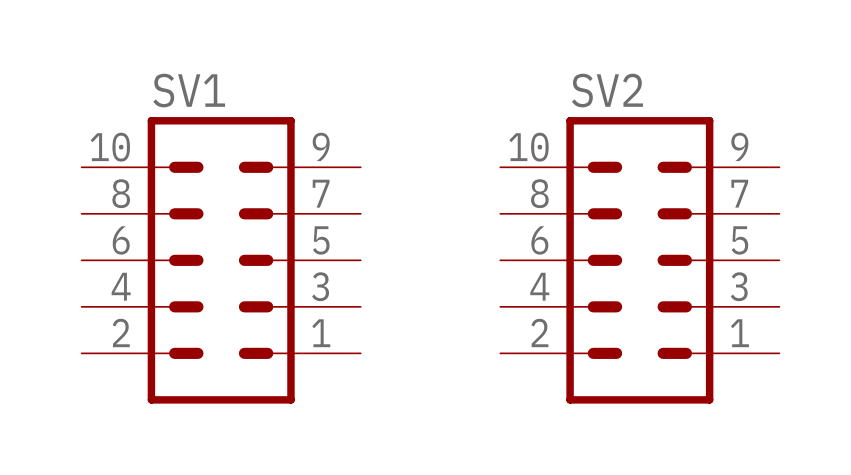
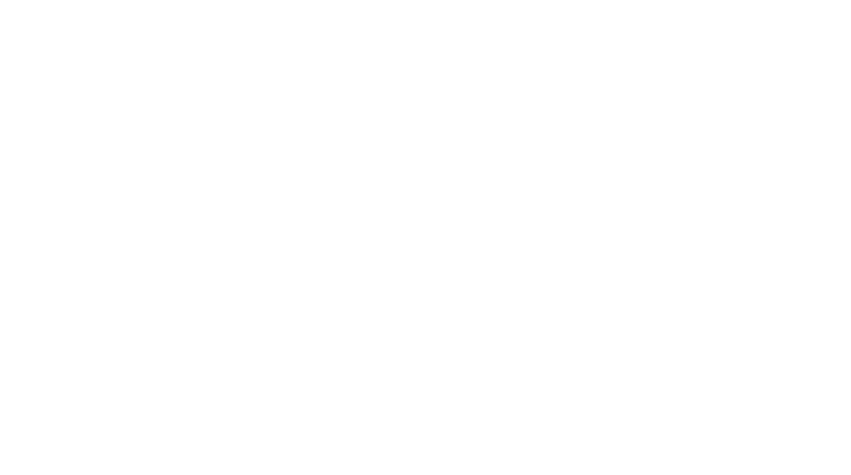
SV1: (221, 260) -> none
SV2: (639, 260) -> none

